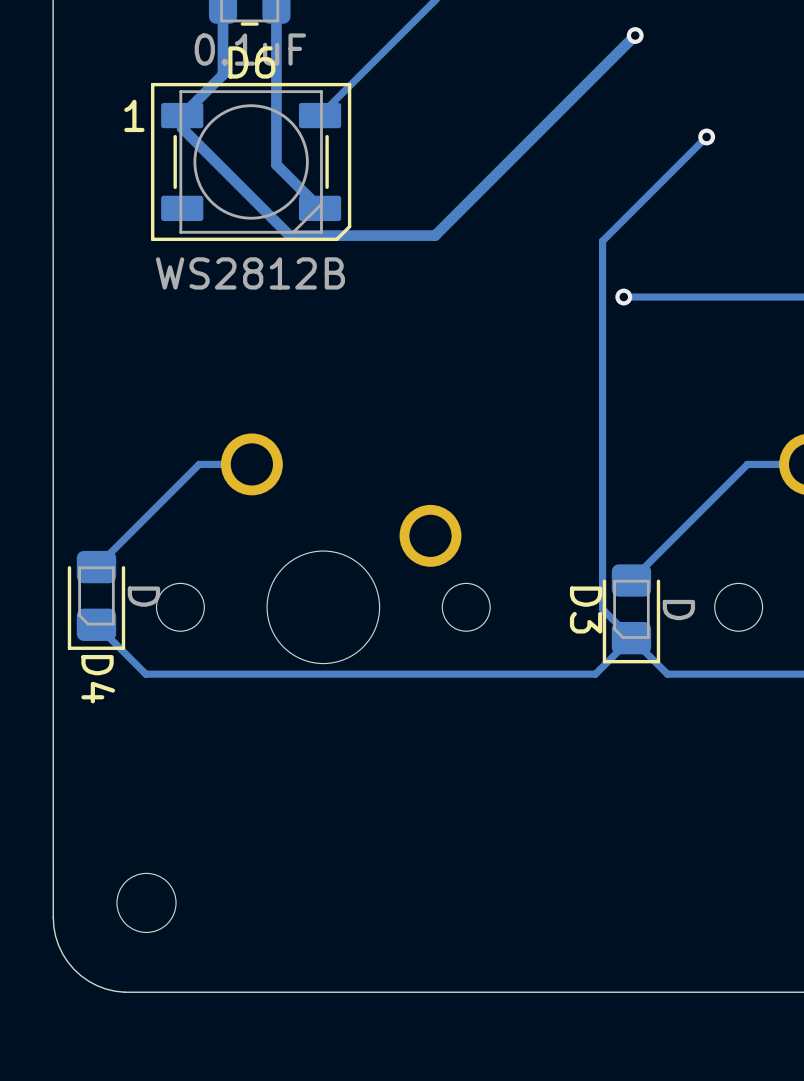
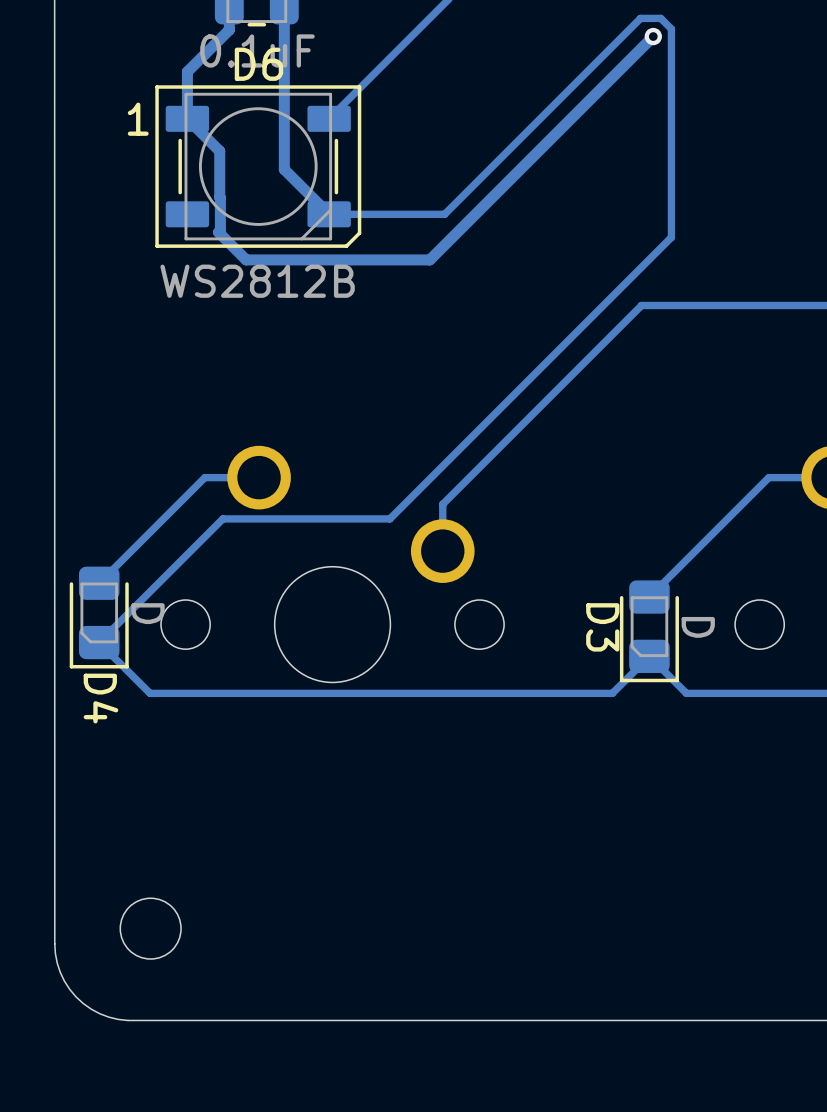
track: (222, 29) (222, 74) (182, 115) (182, 128) (289, 235) (435, 235) -> (229, 29) (187, 71) (187, 118) (219, 151) (220, 230) (218, 232) (246, 259) (429, 259) (447, 242)
track: (706, 136) (602, 241) (602, 609) (631, 638) -> none
via: (706, 136) -> none
track: none -> (329, 214) (444, 214) (640, 18) (660, 18) (671, 29) (671, 237) (389, 518) (222, 518) (99, 642)
track: none -> (641, 305) (442, 504) (442, 551)
via: (623, 297) -> none

